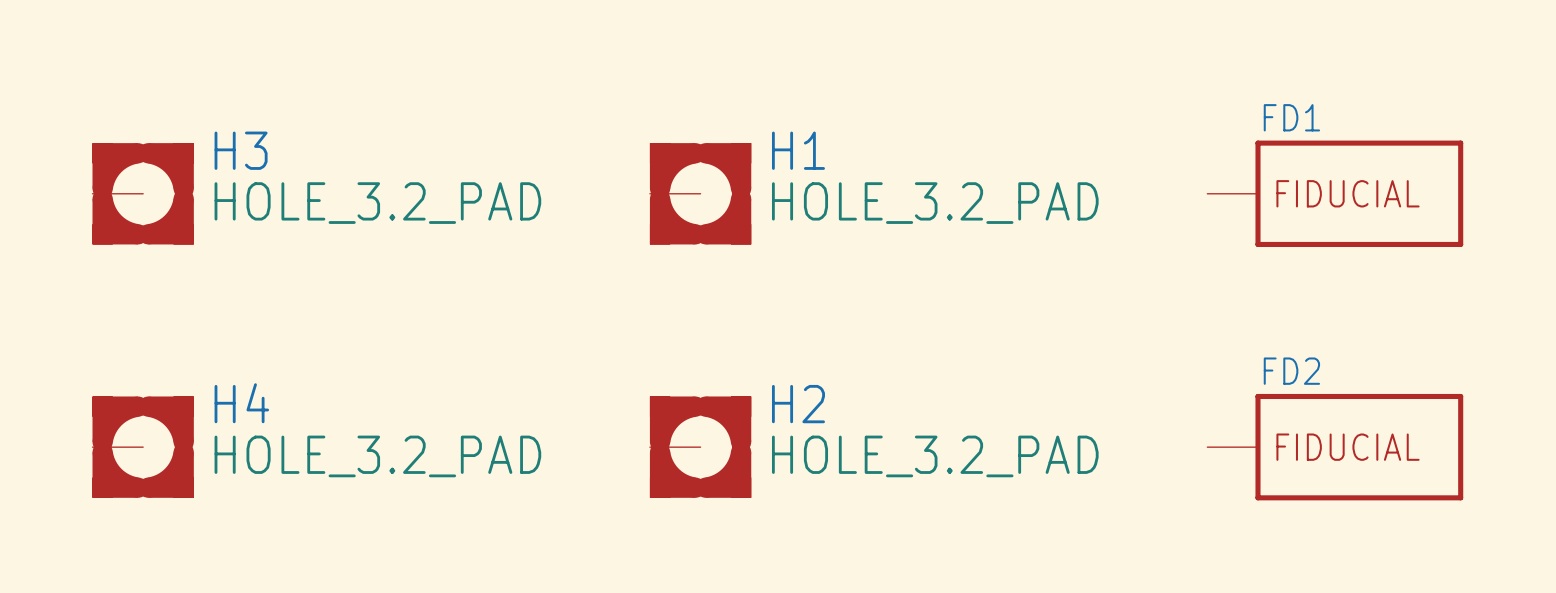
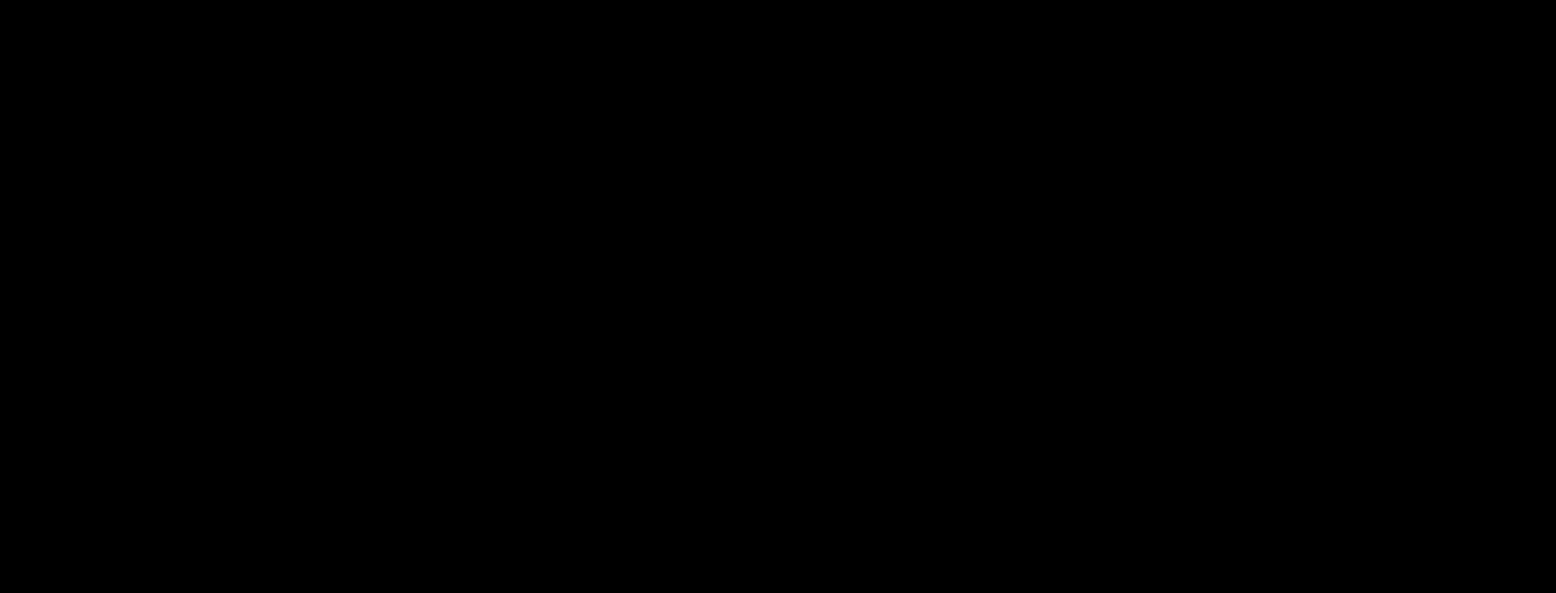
H3: HOLE_3.2_PAD (143, 193) -> none
H1: HOLE_3.2_PAD (700, 193) -> none
FD1: (1335, 193) -> none
H4: HOLE_3.2_PAD (143, 447) -> none
H2: HOLE_3.2_PAD (700, 447) -> none
FD2: (1335, 447) -> none

